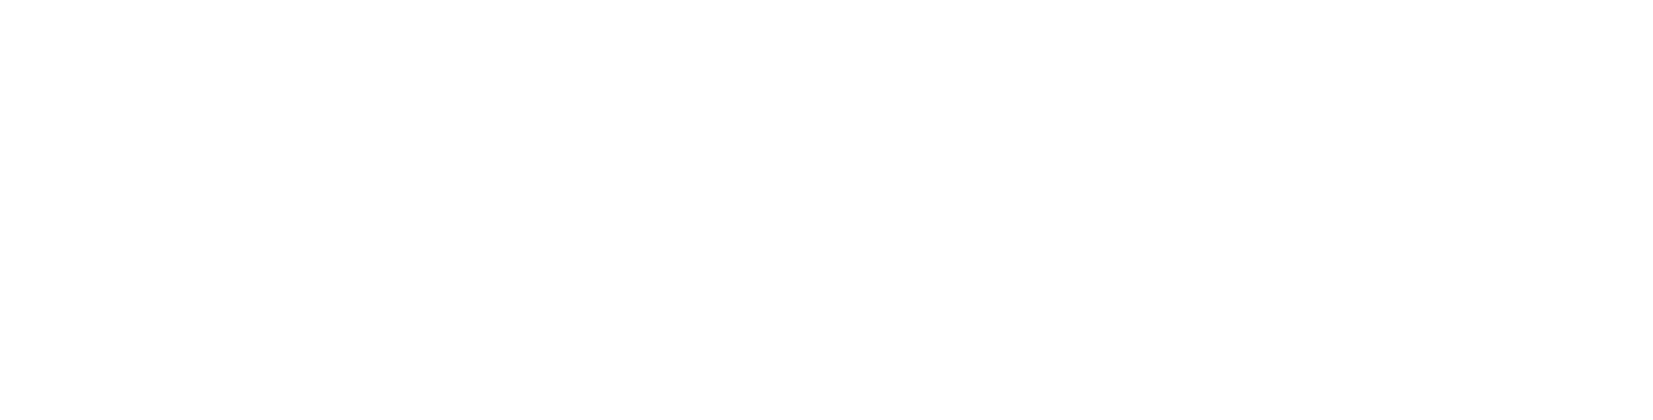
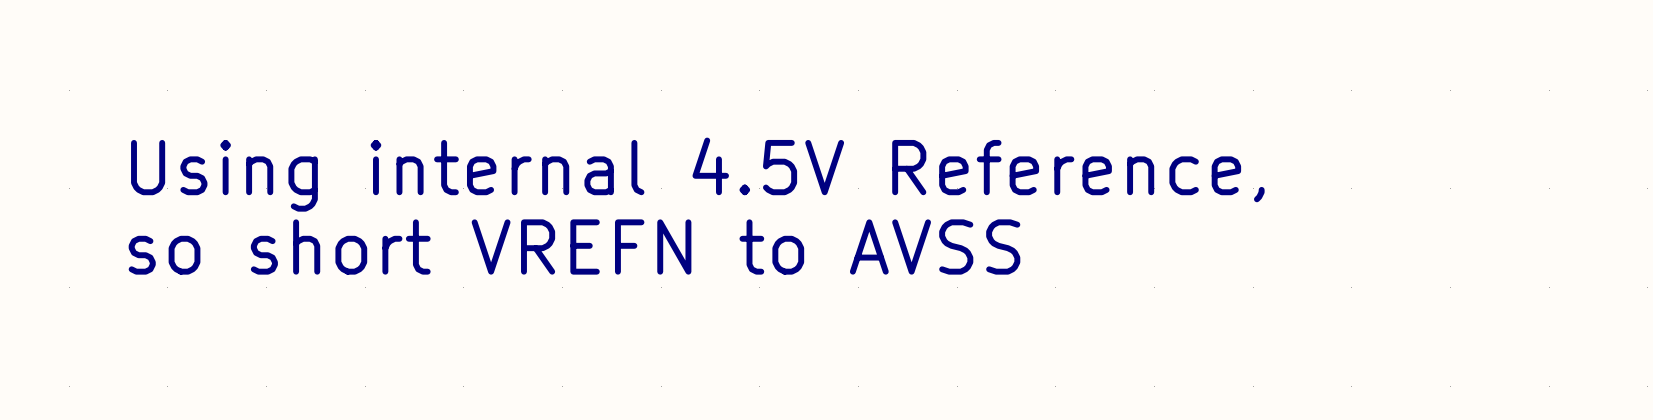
text: none -> Using internal 4.5V Reference, (697, 174)
text: none -> so short VREFN to AVSS (574, 247)

